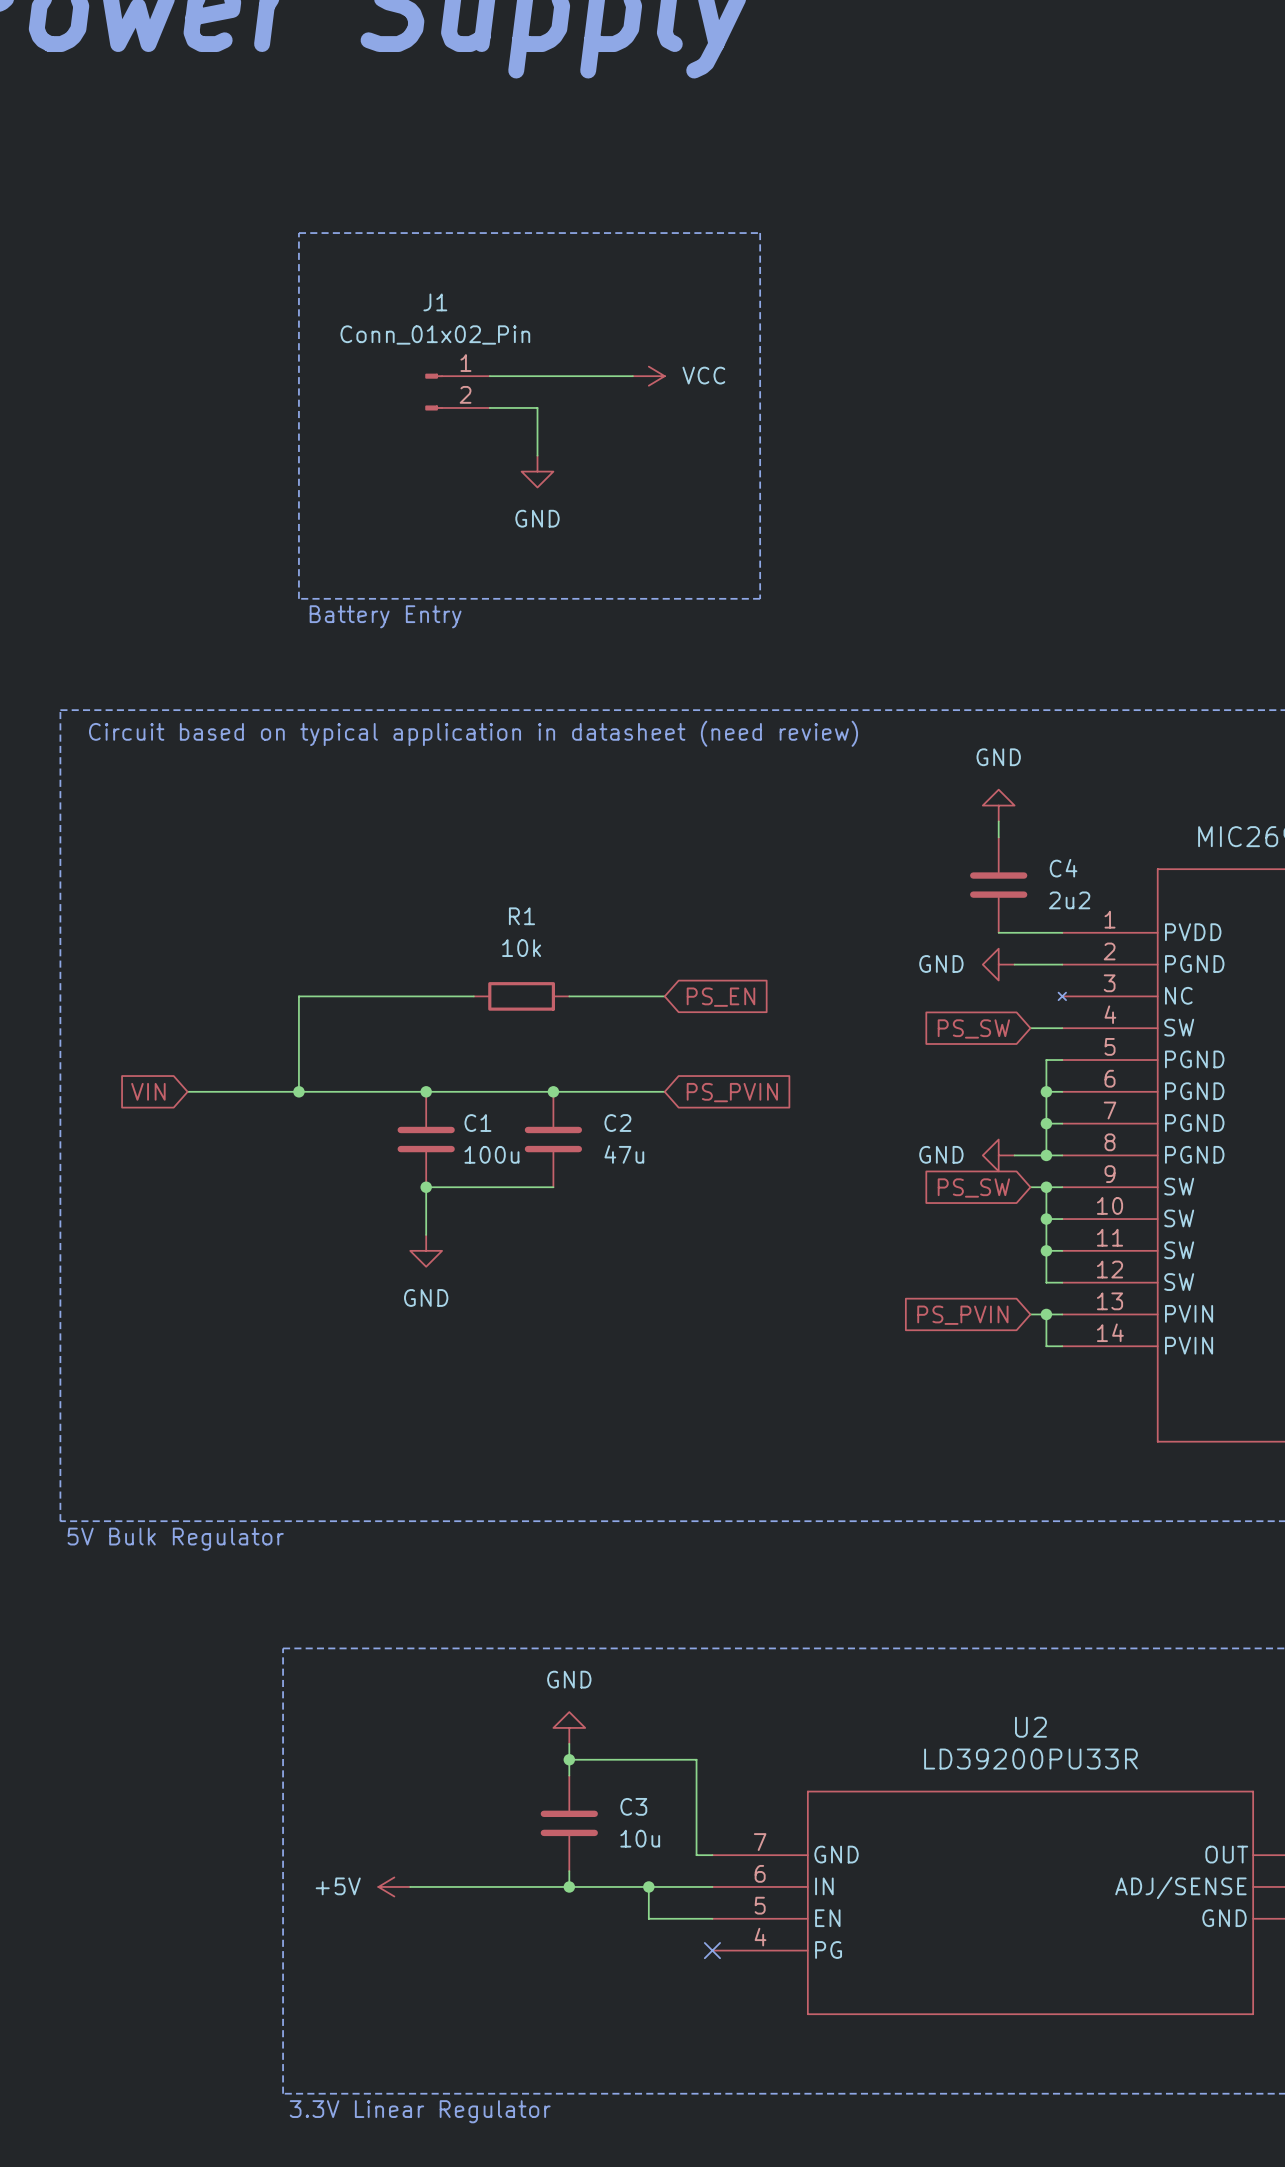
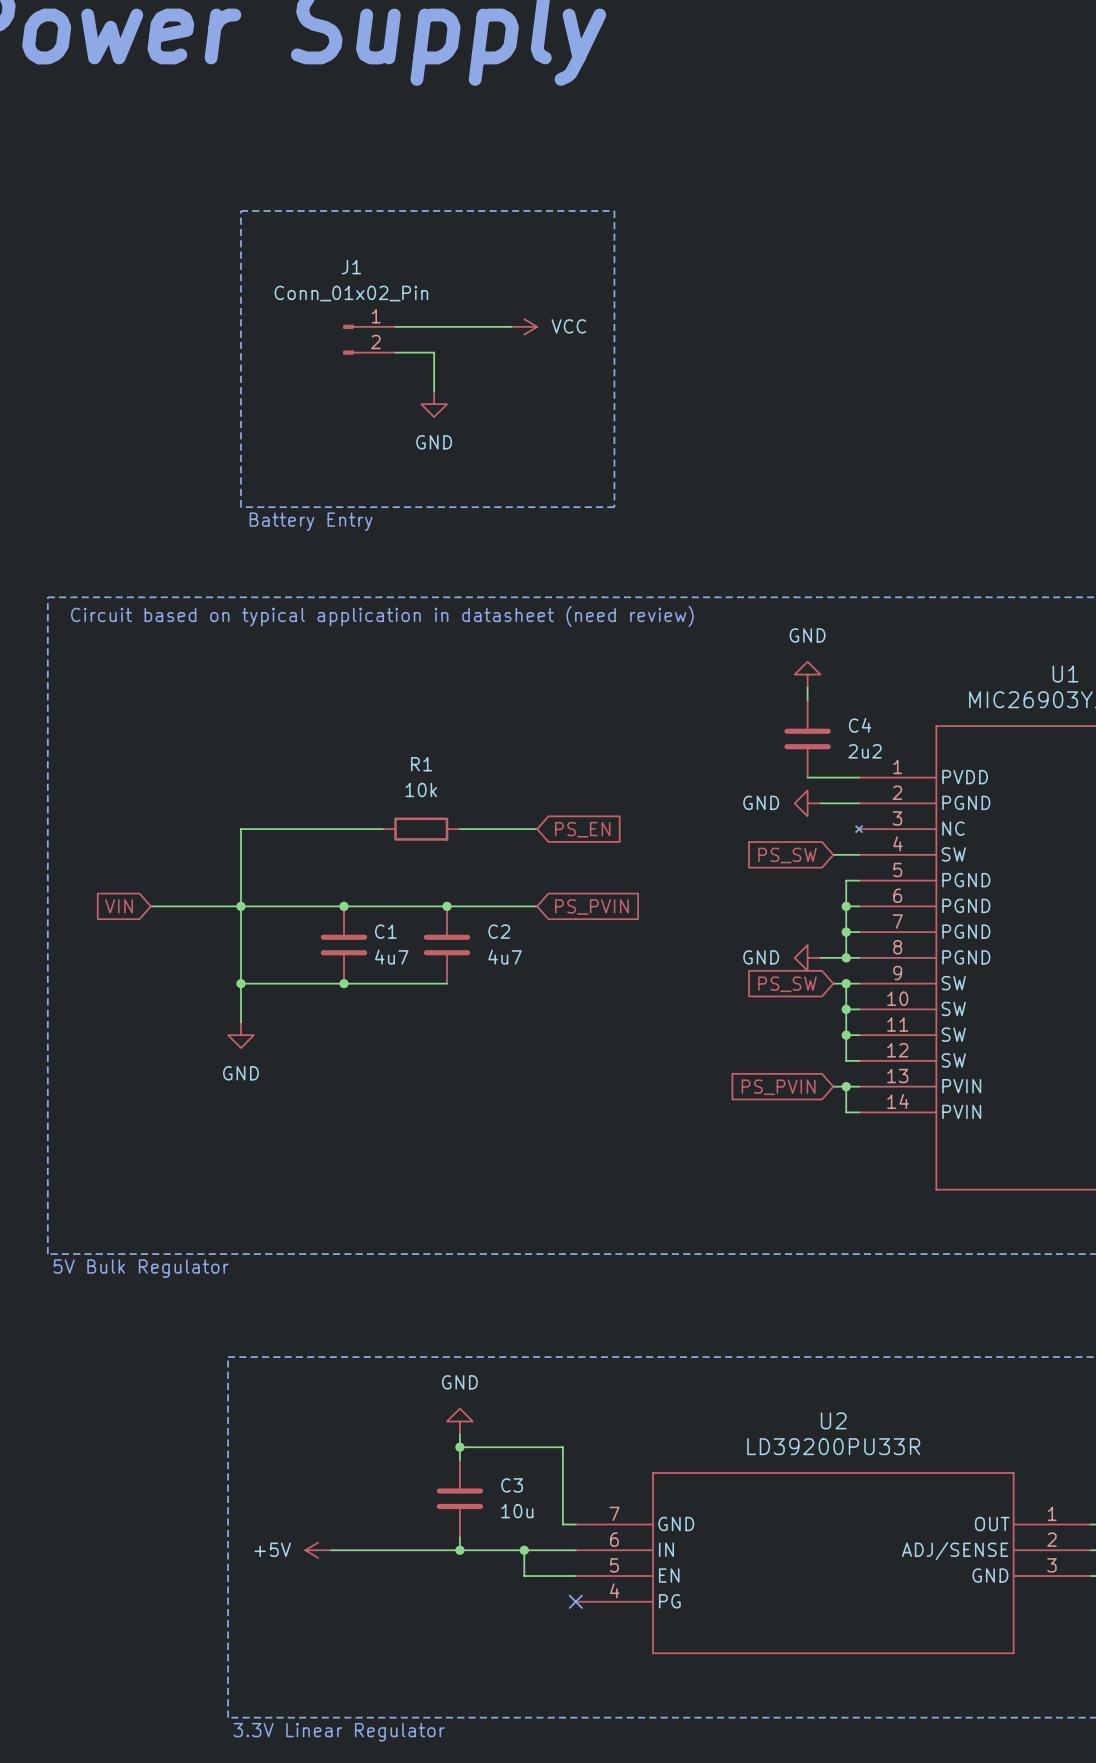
wire: none -> (240, 906) (240, 1022)
C1 value: 100u (491, 1154) -> 4u7 (391, 957)
C2 value: 47u (624, 1154) -> 4u7 (505, 957)
junction: none -> (240, 983)
wire: (426, 1187) (426, 1234) -> (343, 983) (240, 983)
power symbol position: GND (426, 1250) -> GND (240, 1035)

